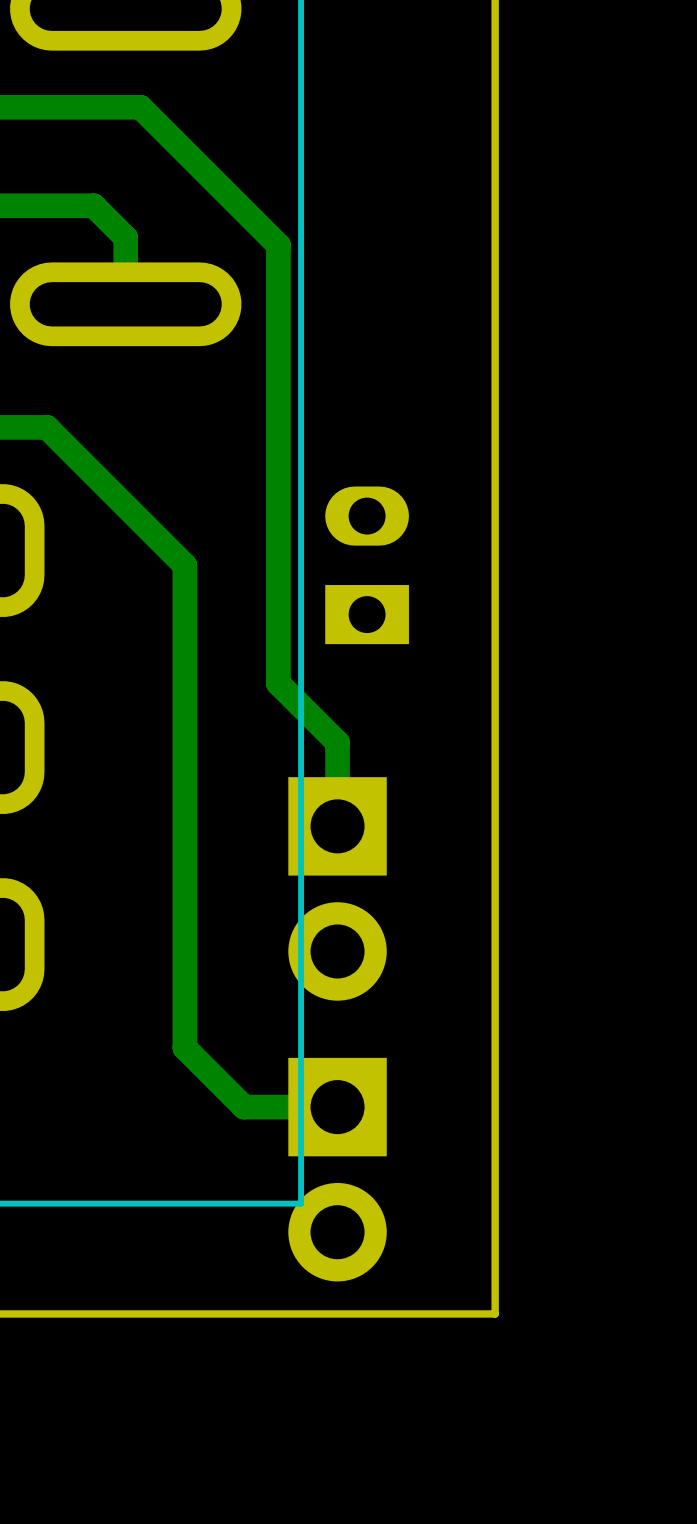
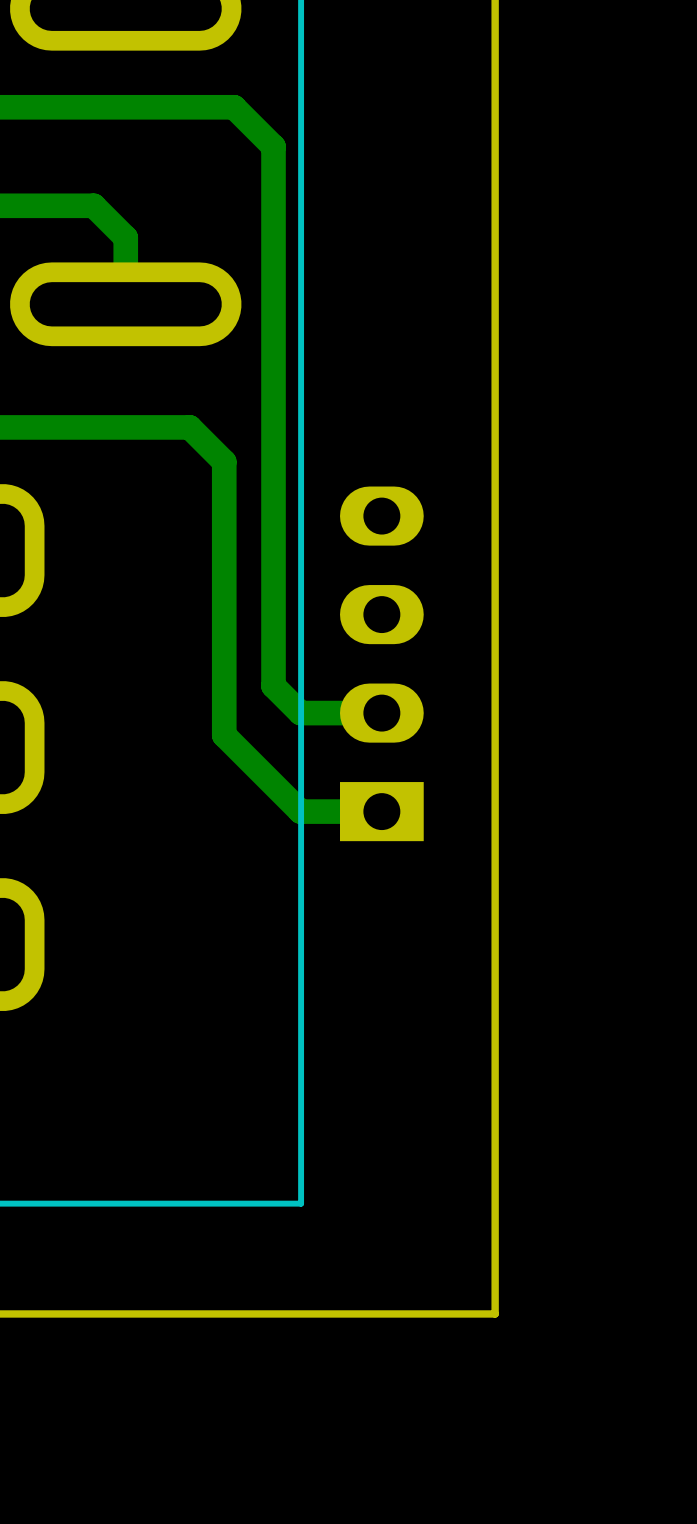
track: (140, 107) (278, 245) (278, 683) (337, 742) (337, 826) -> (140, 107) (234, 107) (273, 146) (273, 686) (300, 713) (367, 713)
track: (46, 427) (184, 565) (184, 1047) (243, 1107) (337, 1107) -> (46, 427) (189, 427) (224, 461) (224, 735) (300, 811) (367, 811)
part: (367, 565) -> none
part: none -> (381, 663)
part: (337, 888) -> none
part: (337, 1169) -> none

